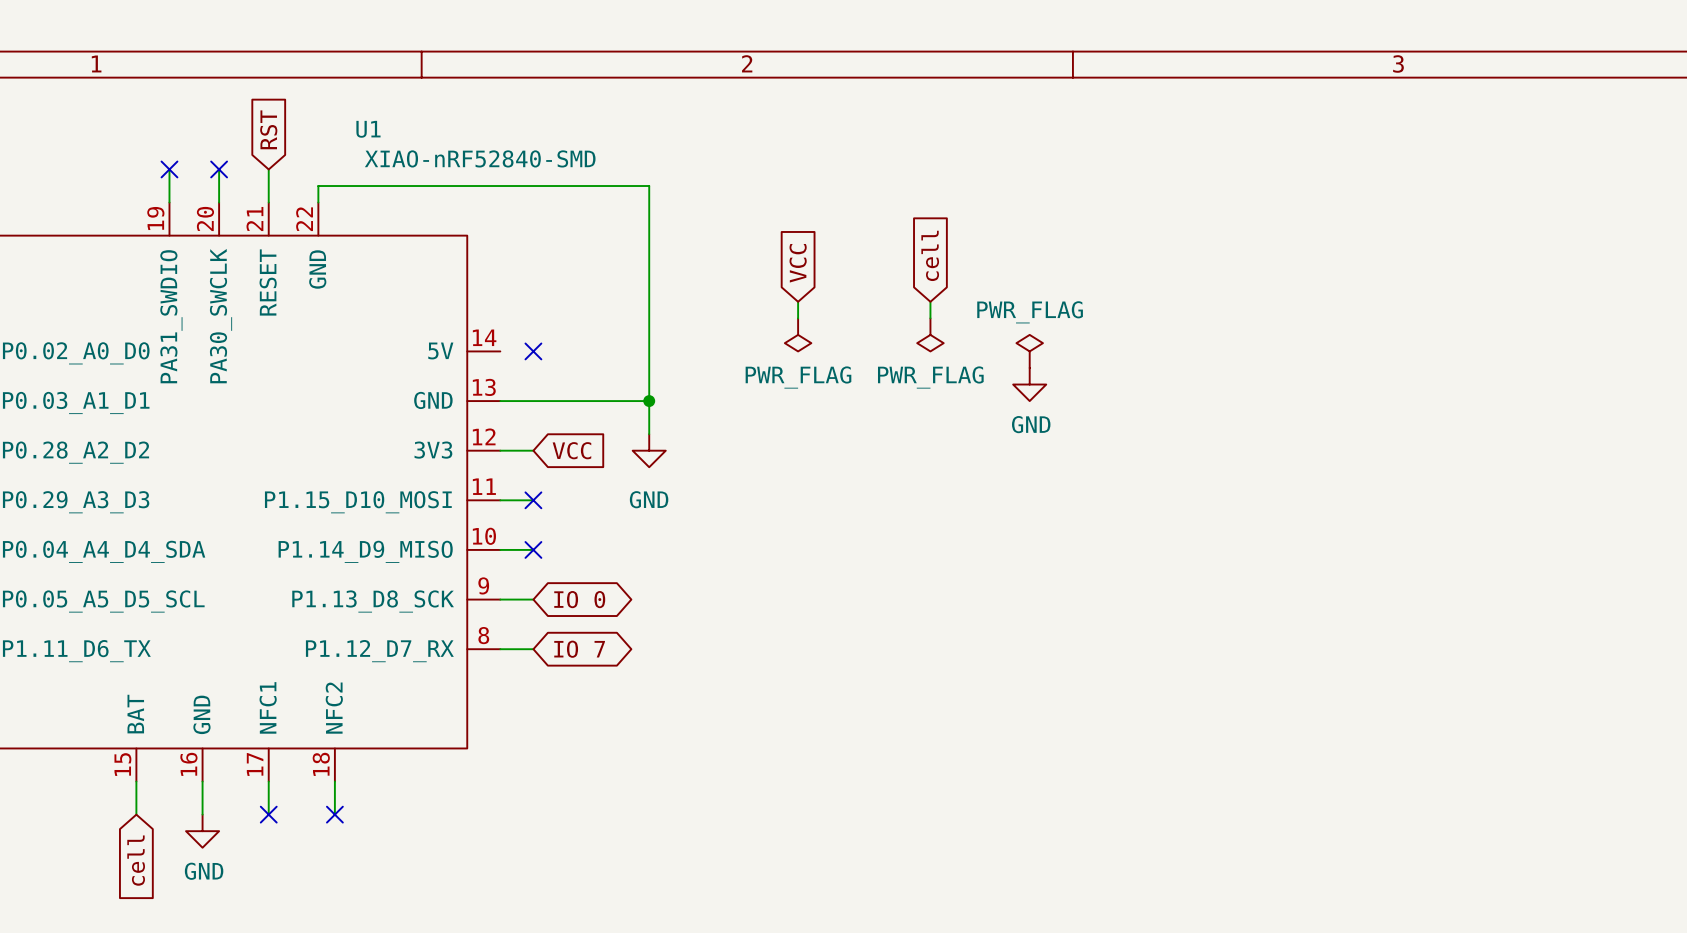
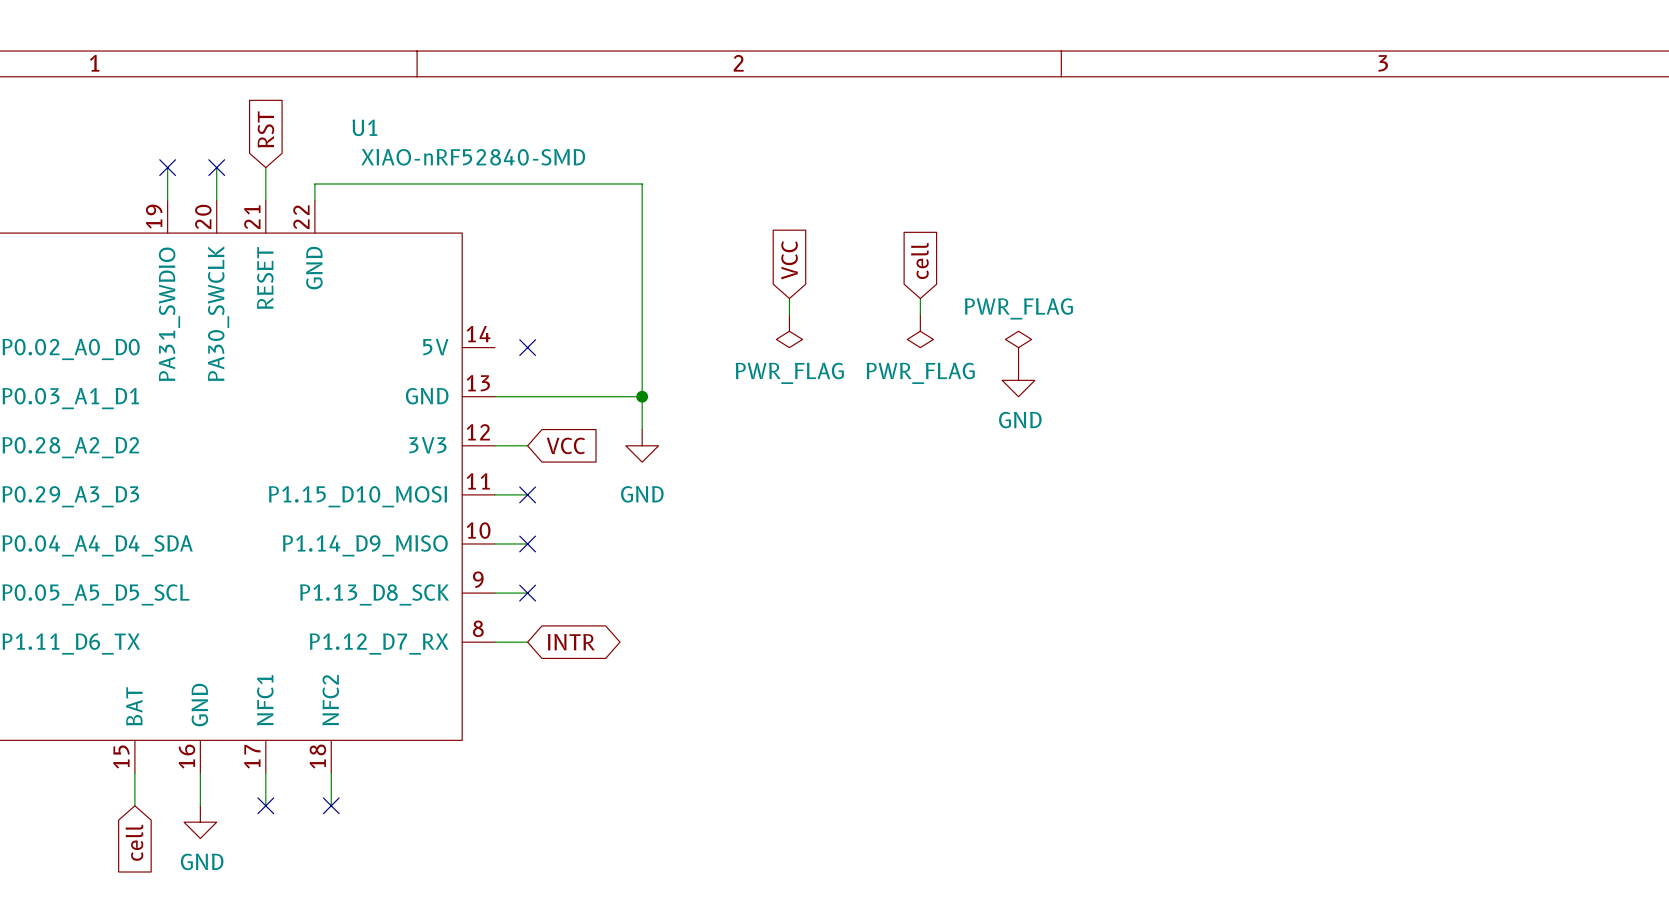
no-connect mark: none -> (527, 593)
global label: IO 0 (579, 599) -> none
global label: IO 7 (579, 649) -> INTR (571, 642)

